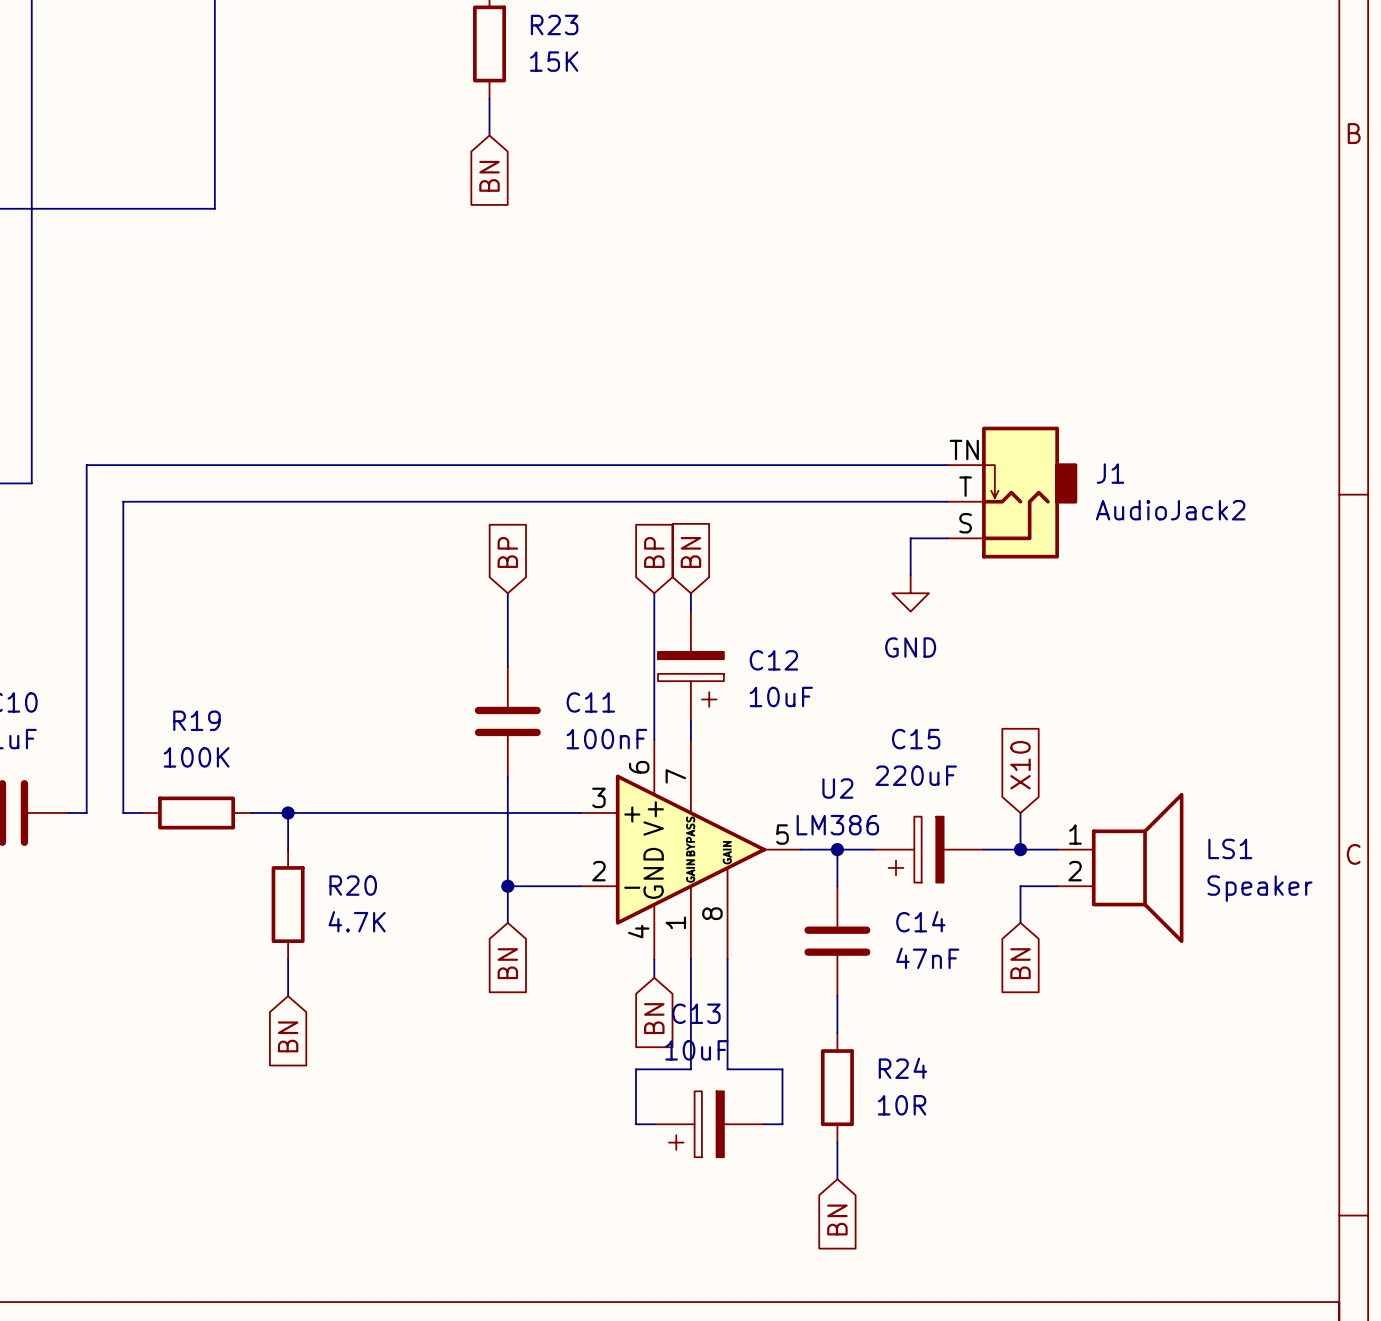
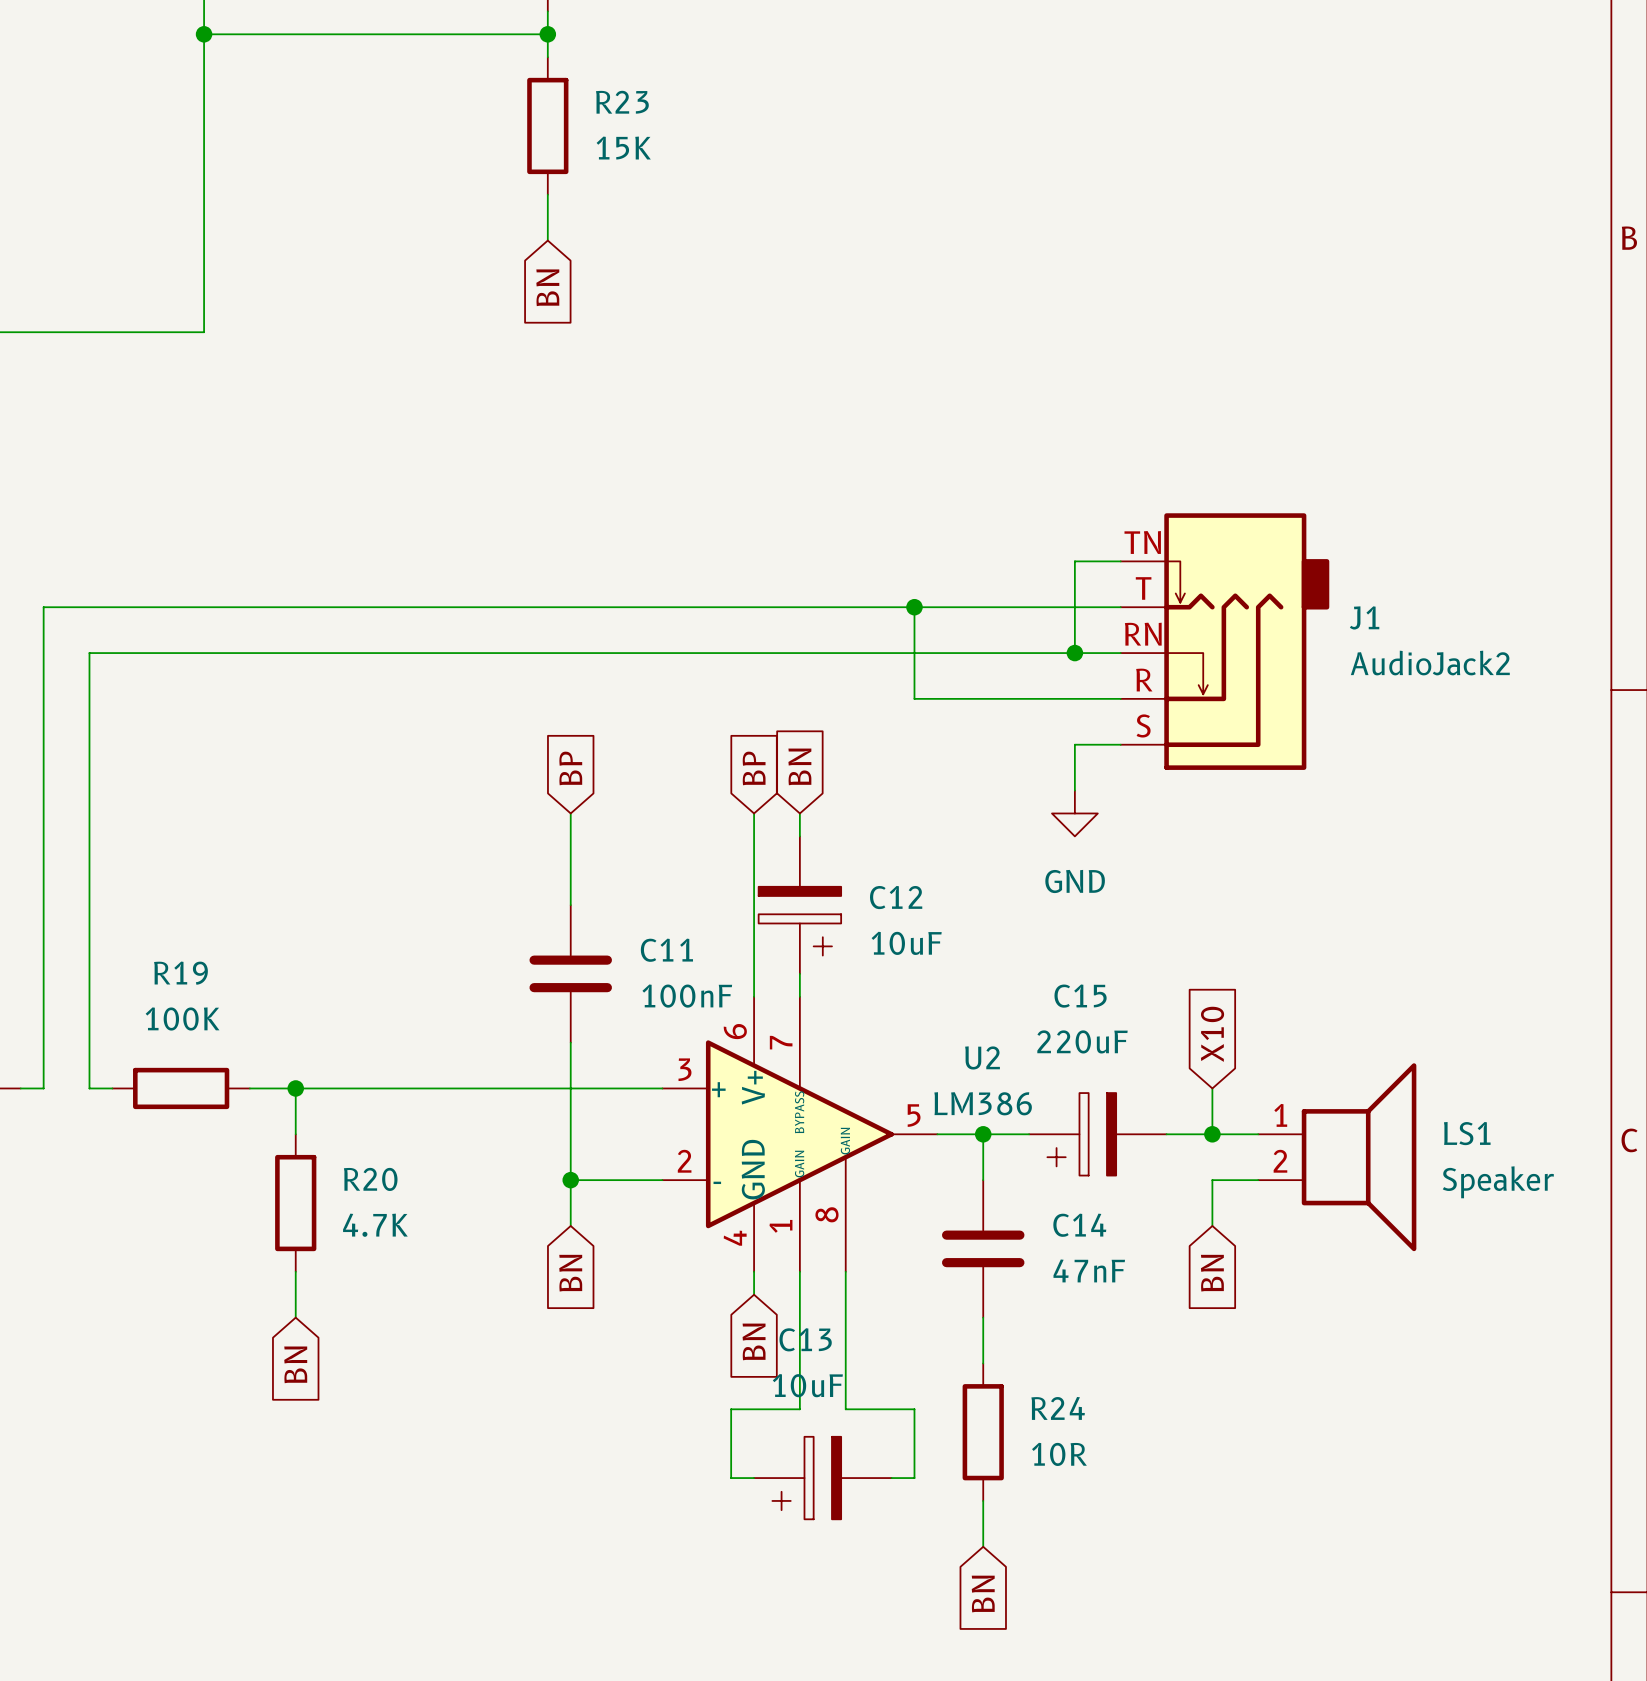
wire: none -> (1120, 561) (1074, 561) (1074, 653)
J1 symbol: [947, 426, 1078, 559] -> [1120, 513, 1330, 770]
junction: none -> (914, 607)
wire: none -> (1120, 607) (43, 607) (43, 653)
wire: (86, 465) (123, 465) -> (89, 698) (89, 653)
junction: none -> (1074, 653)
wire: (123, 501) (782, 501) -> (914, 607) (914, 698)

